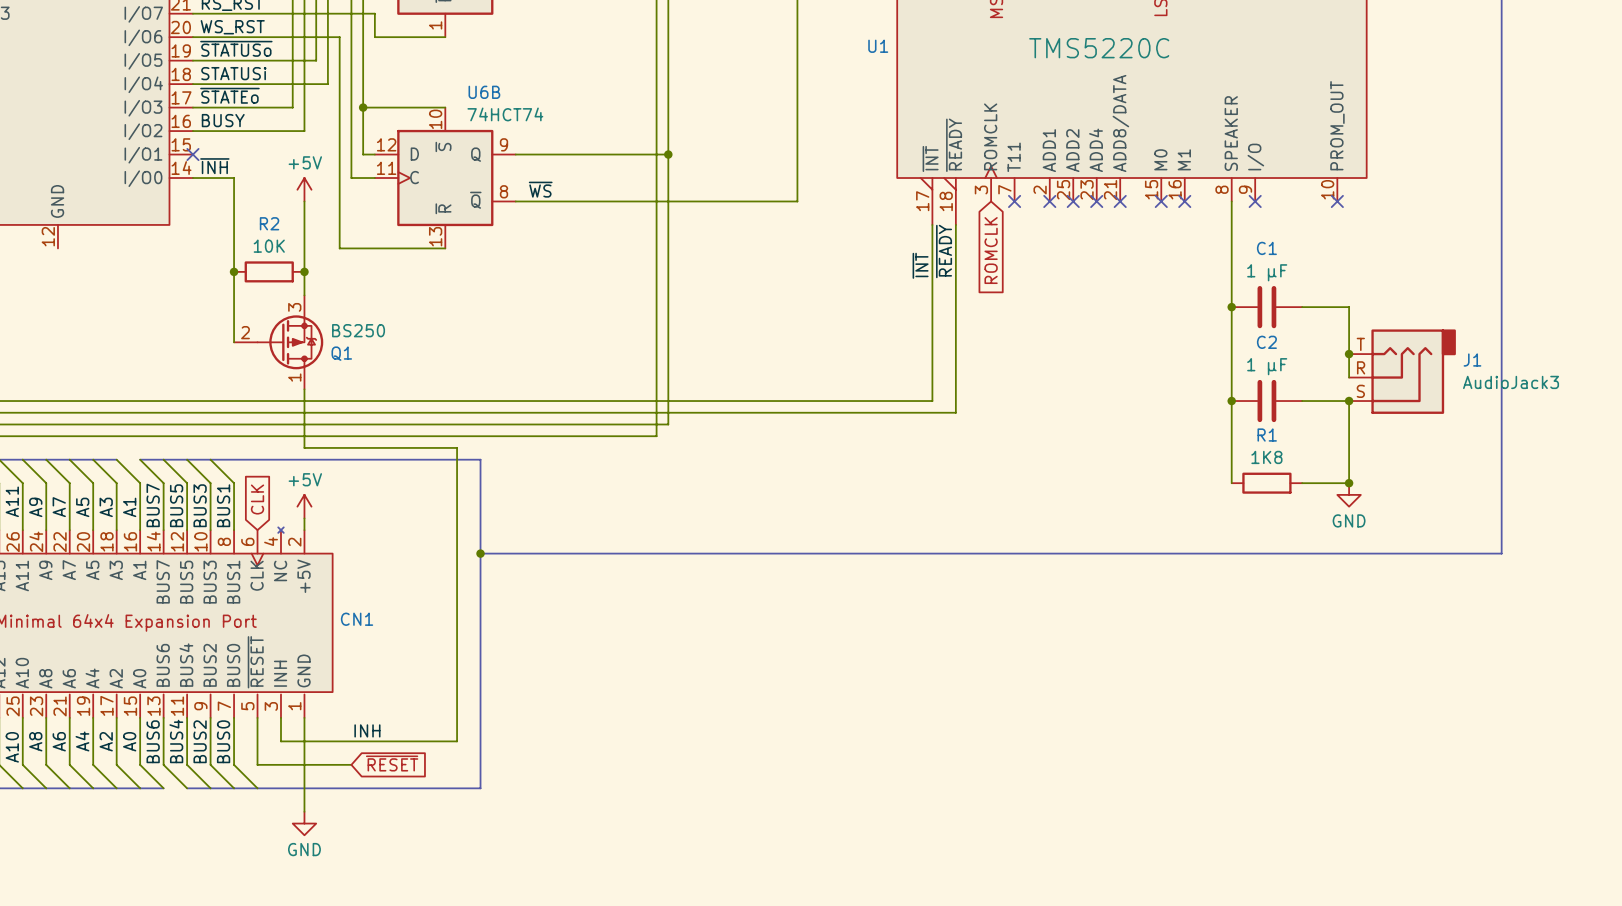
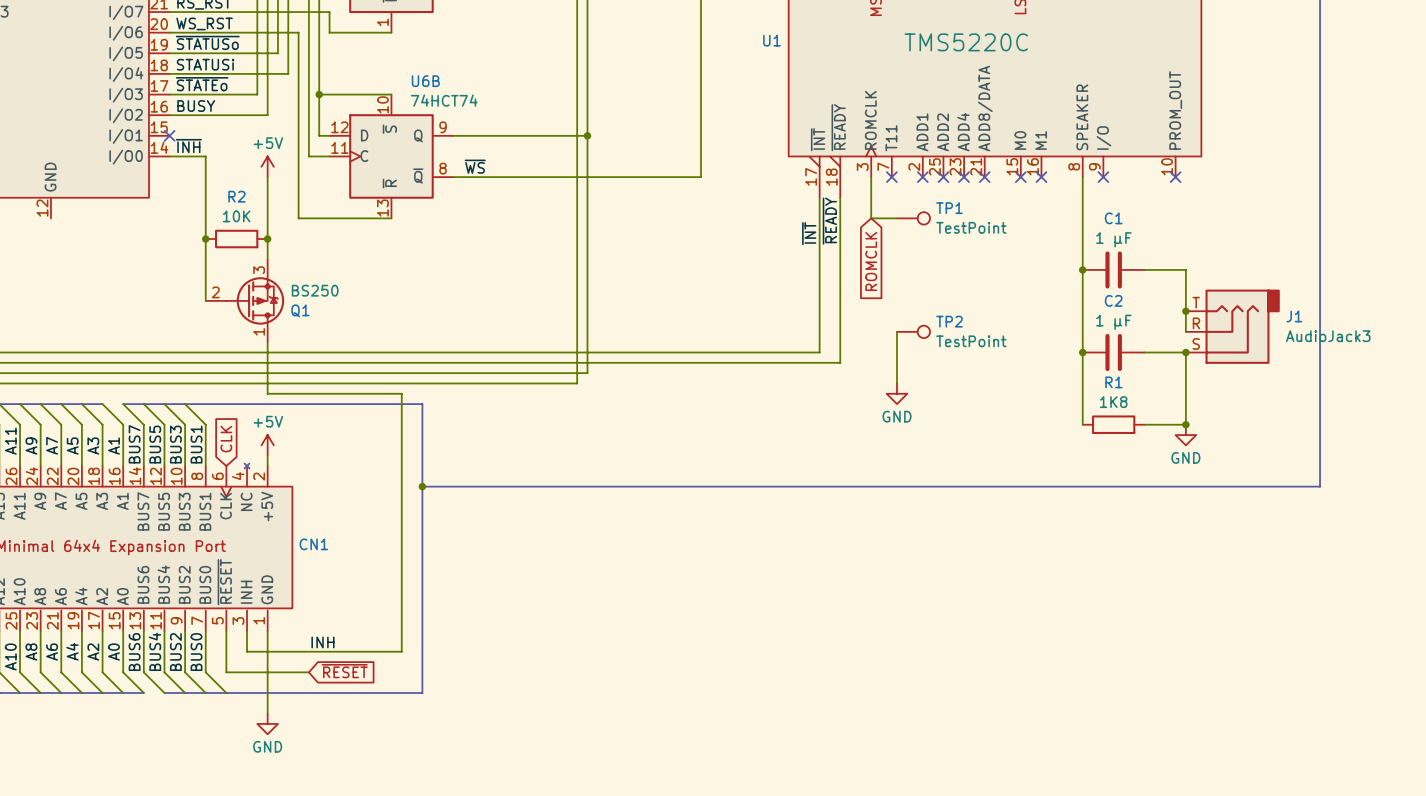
wire: none -> (871, 177) (871, 218) (897, 218)
TP1: none -> TestPoint (913, 218)
global label position: ROMCLK (991, 250) -> ROMCLK (871, 261)
wire: none -> (897, 331) (897, 383)
TP2: none -> TestPoint (913, 331)
power symbol: none -> GND (897, 393)

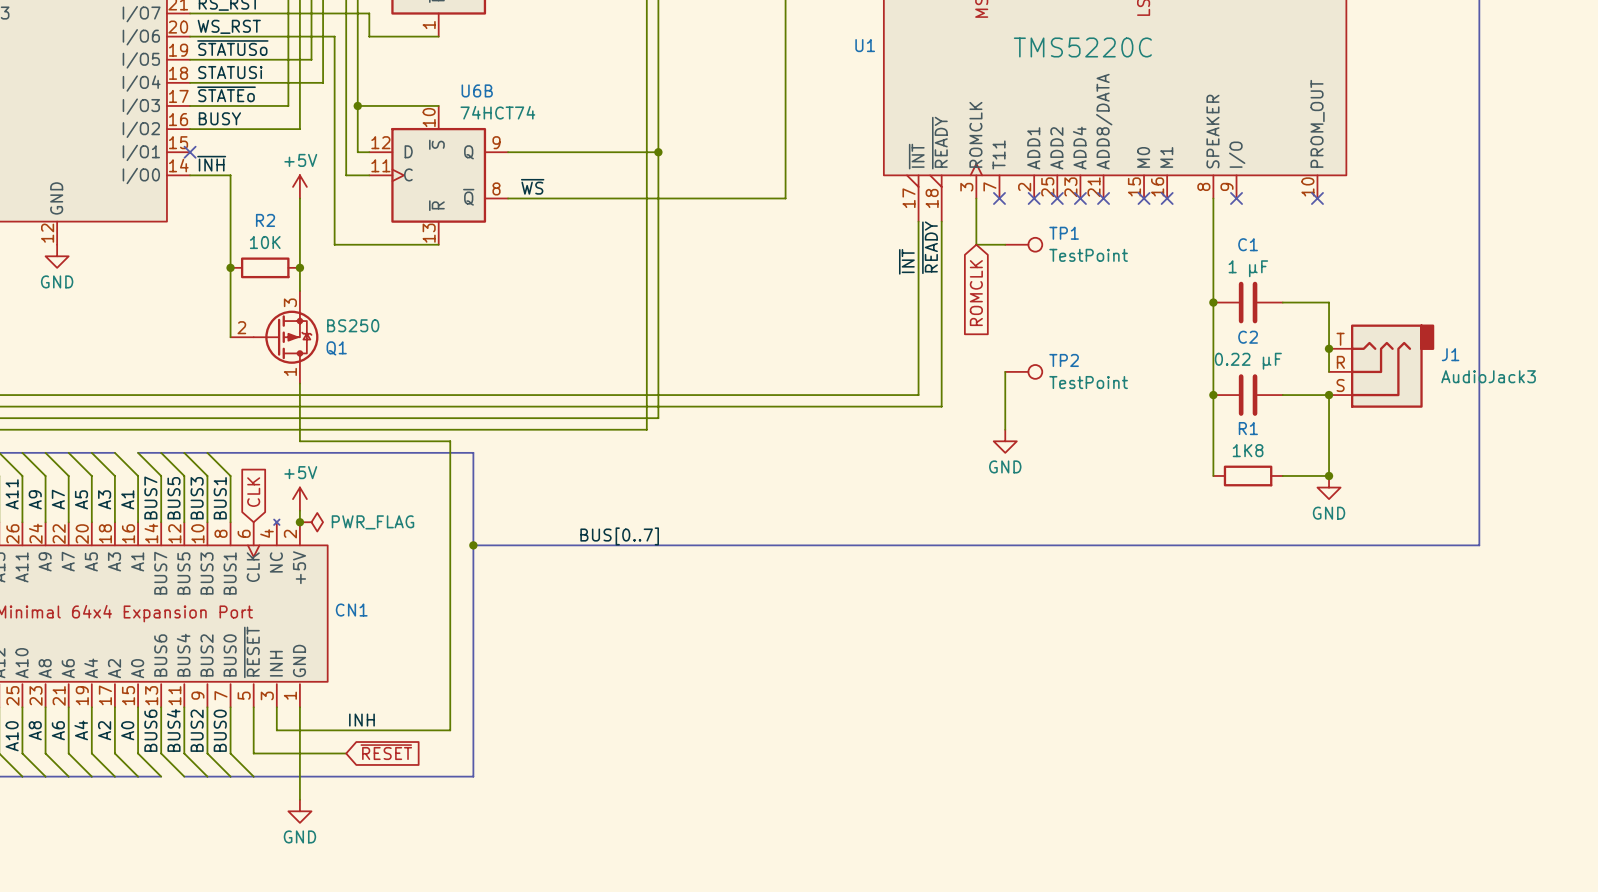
power symbol: none -> GND (57, 256)
C2 value: 1 µF (1113, 322) -> 0.22 µF (1248, 361)
junction: none -> (299, 522)
power symbol: none -> PWR_FLAG (311, 522)
label: none -> BUS[0..7] (619, 536)

